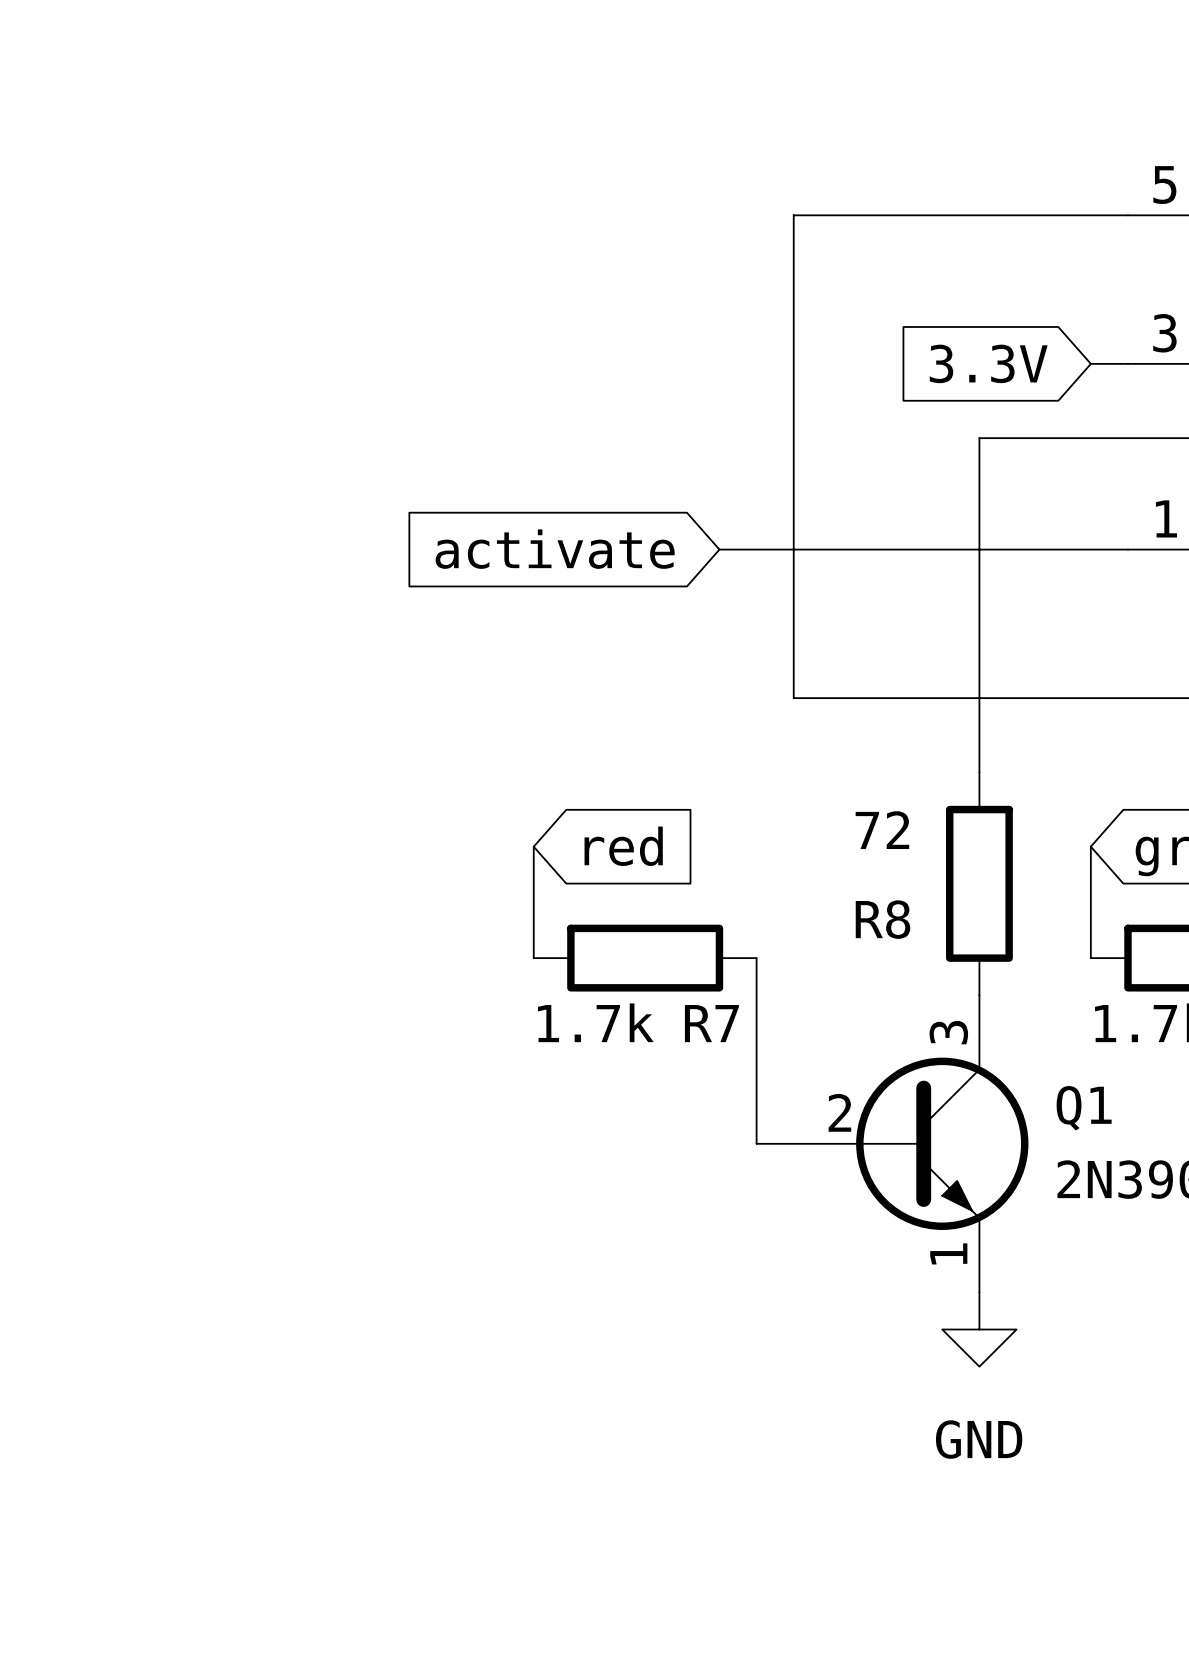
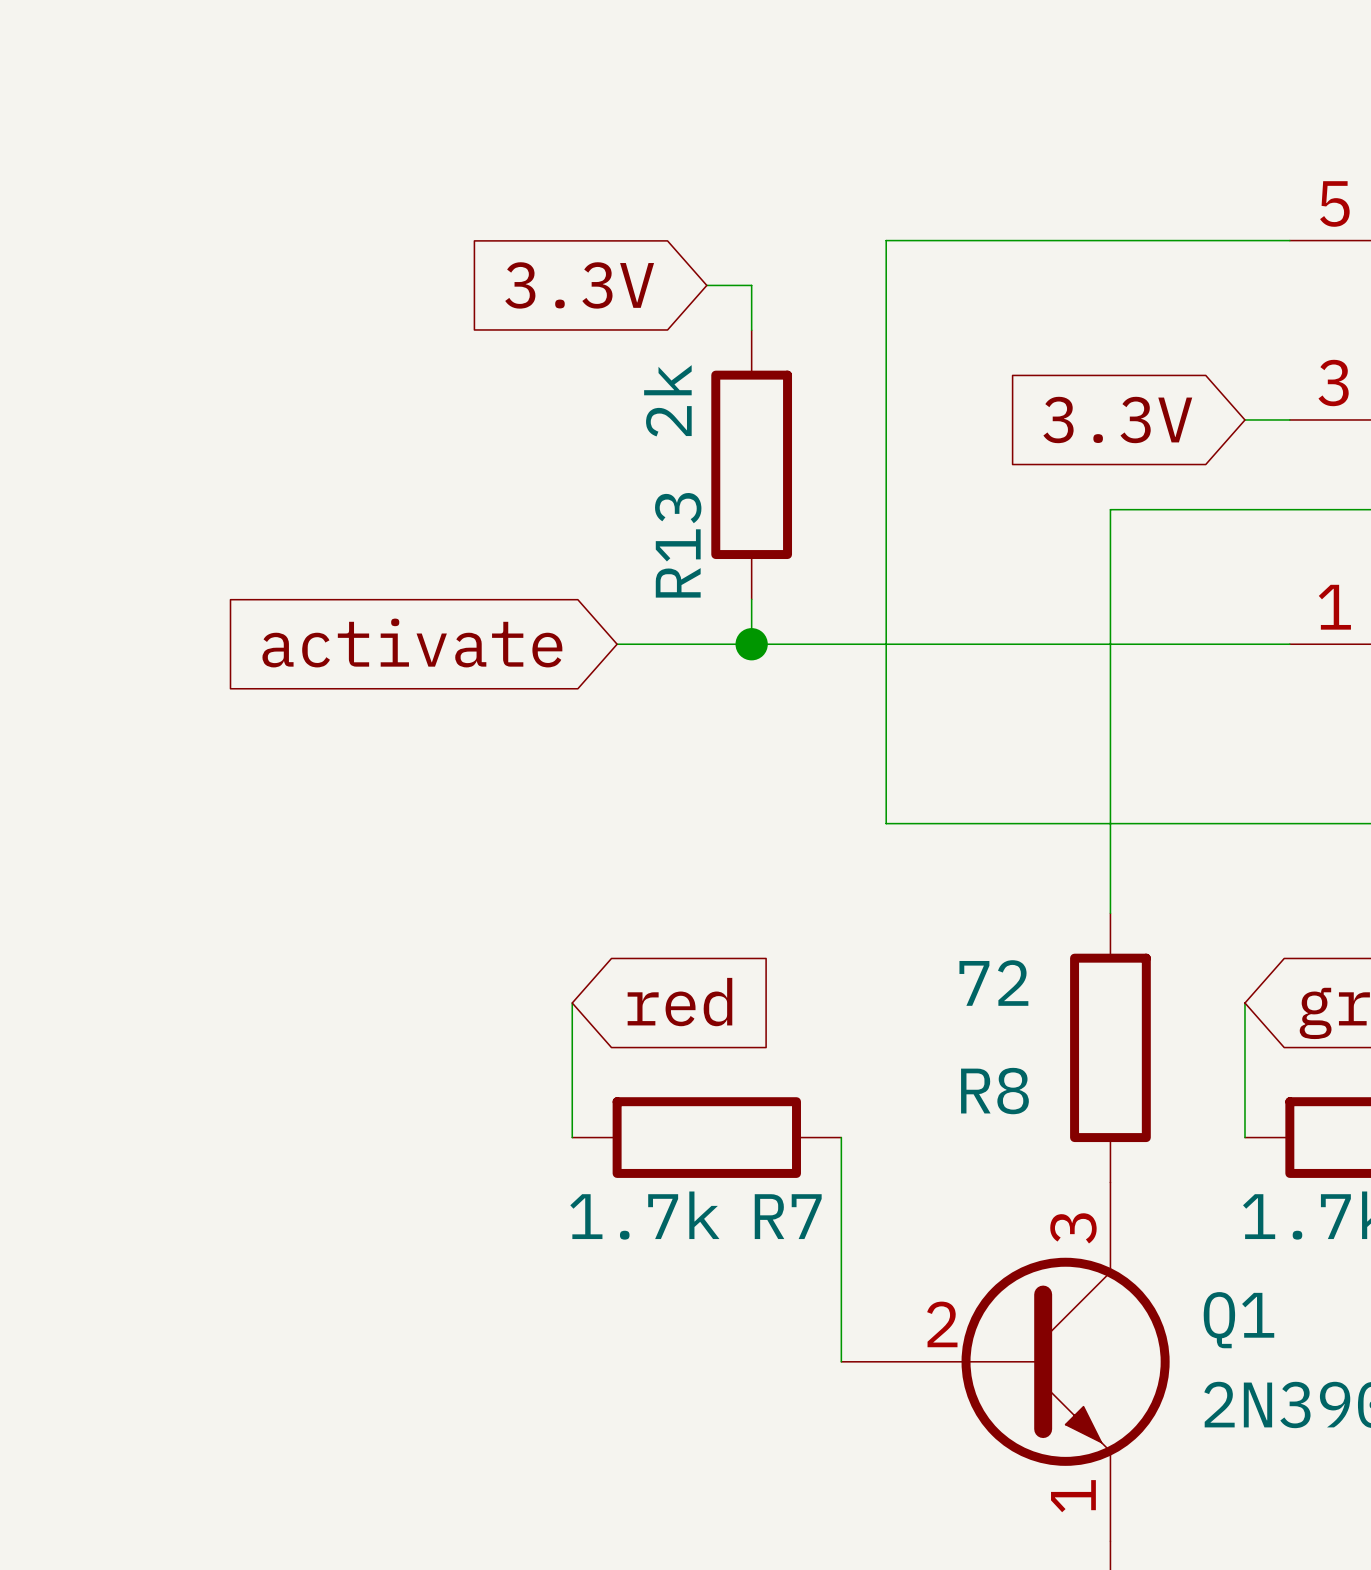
global label: none -> 3.3V (579, 285)
wire: none -> (706, 285) (751, 285) (751, 330)
R13: none -> 2k (751, 464)
wire: none -> (751, 599) (751, 644)
global label position: activate (555, 549) -> activate (412, 643)
wire: none -> (617, 644) (796, 644)
junction: none -> (751, 644)

